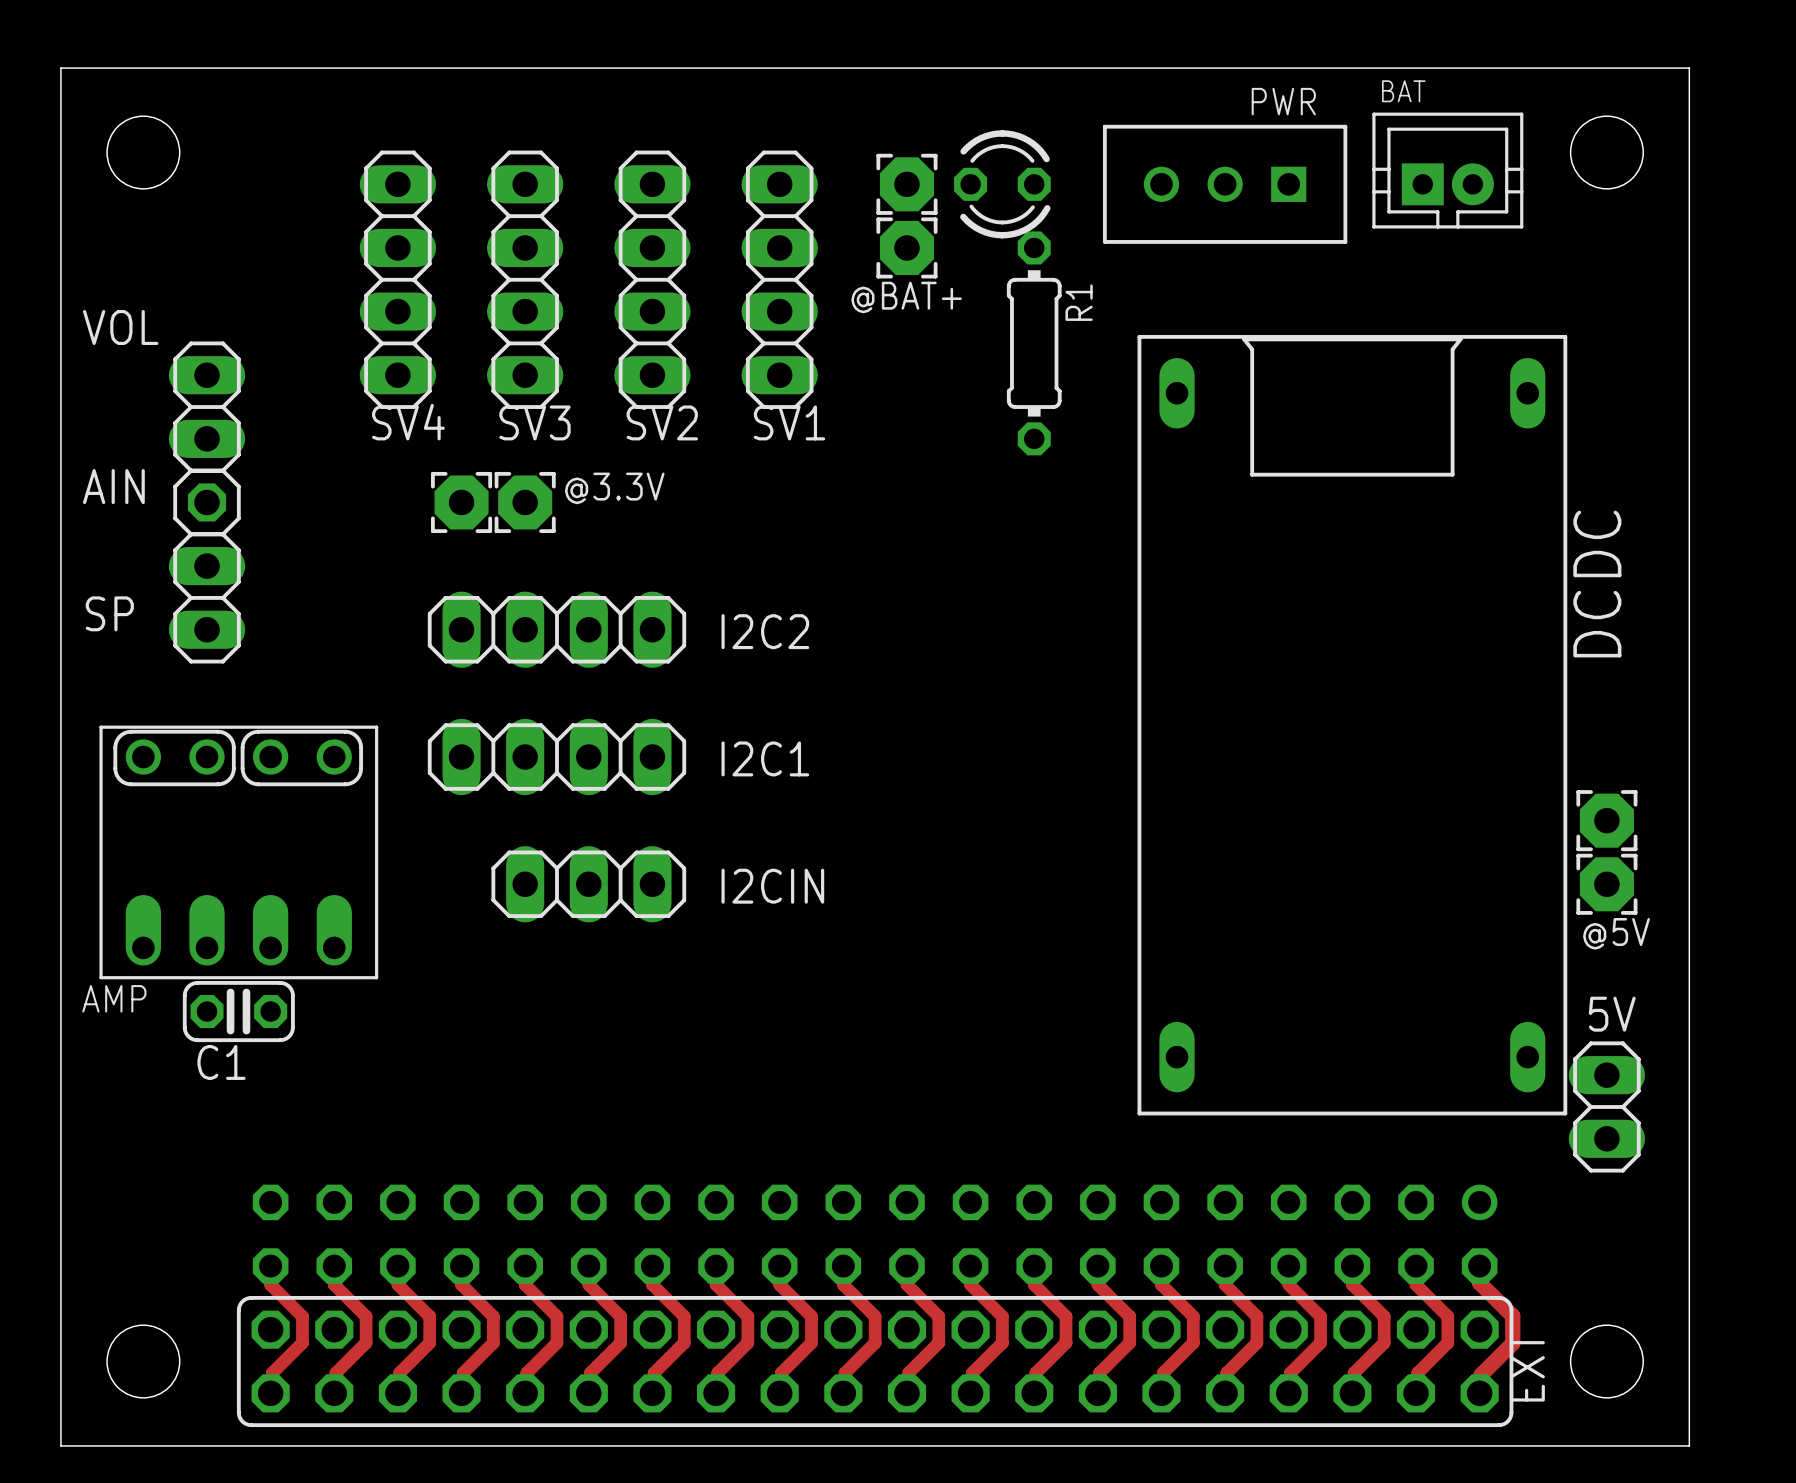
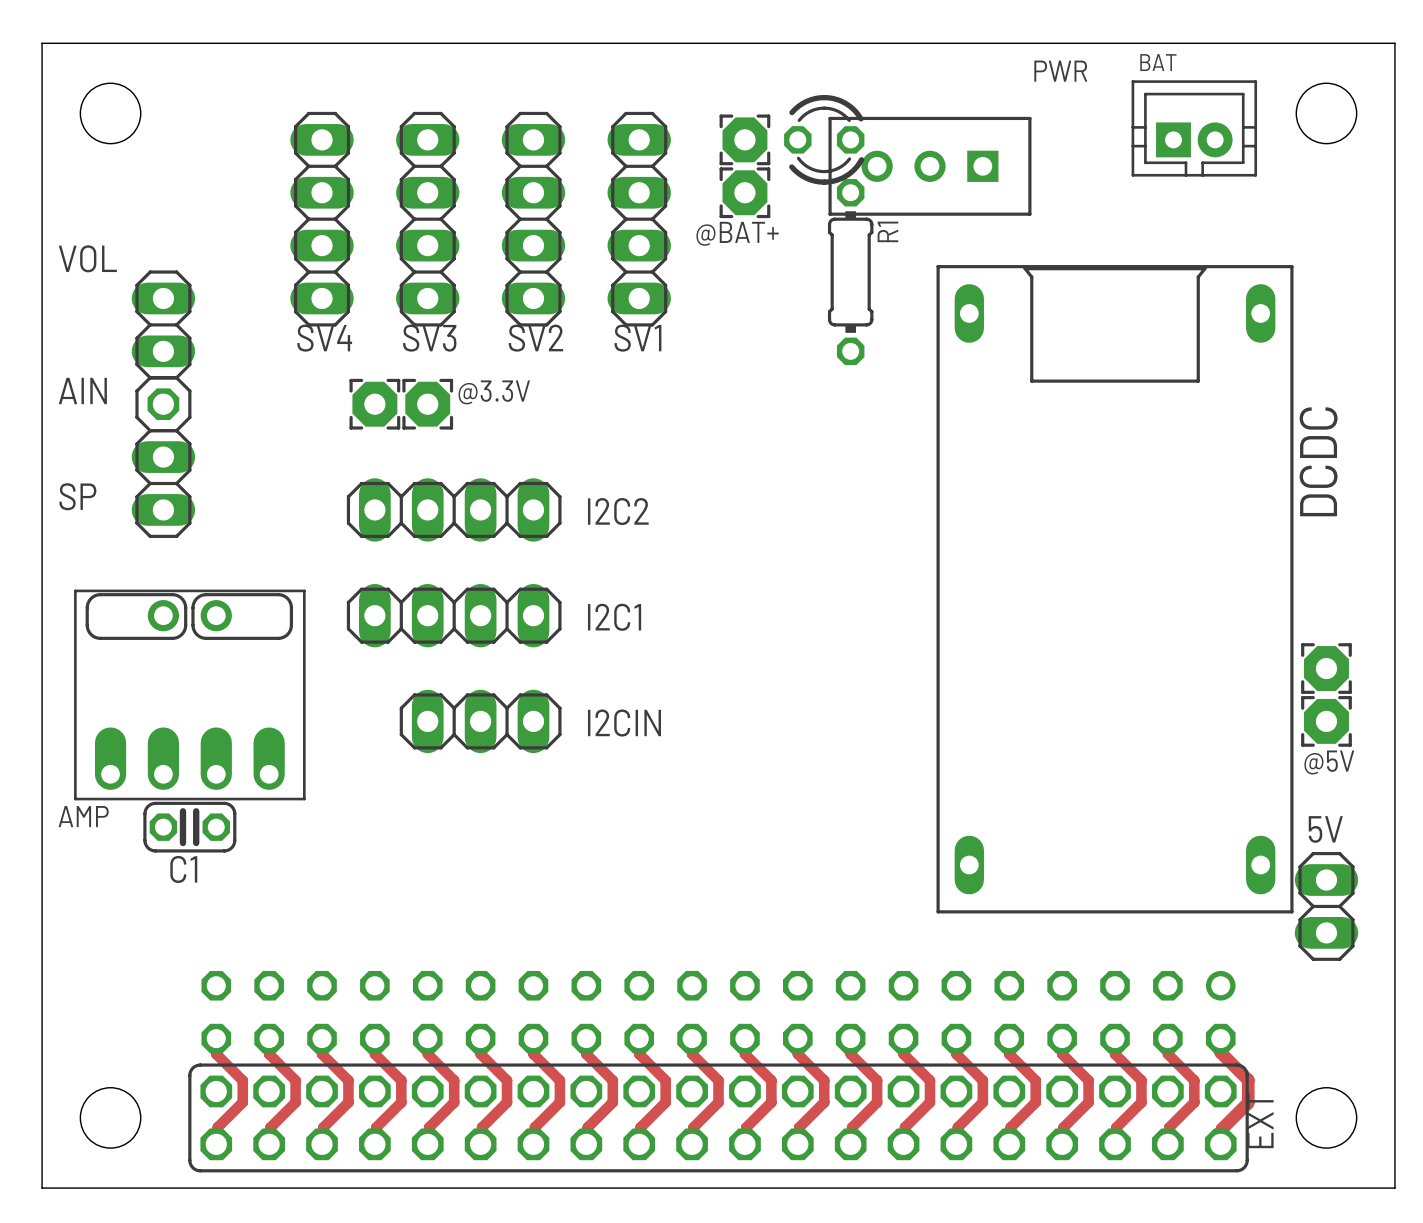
PWR: (1225, 184) -> none
PWR: none -> (929, 166)
AMP footprint: [99, 725, 379, 980] -> [74, 589, 306, 801]

